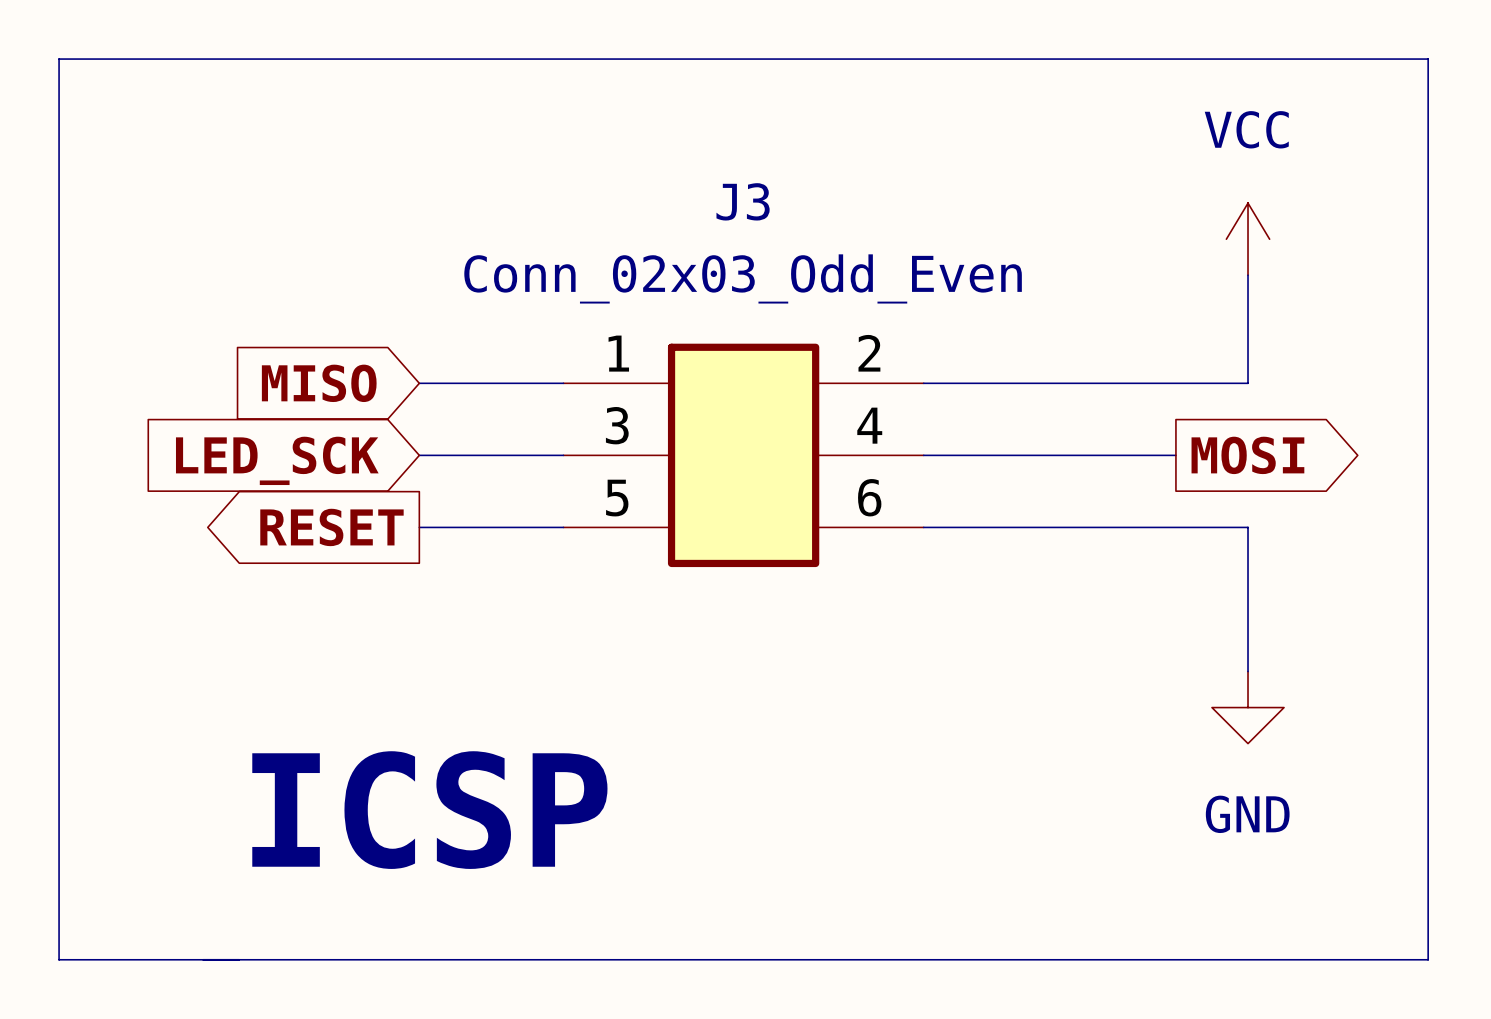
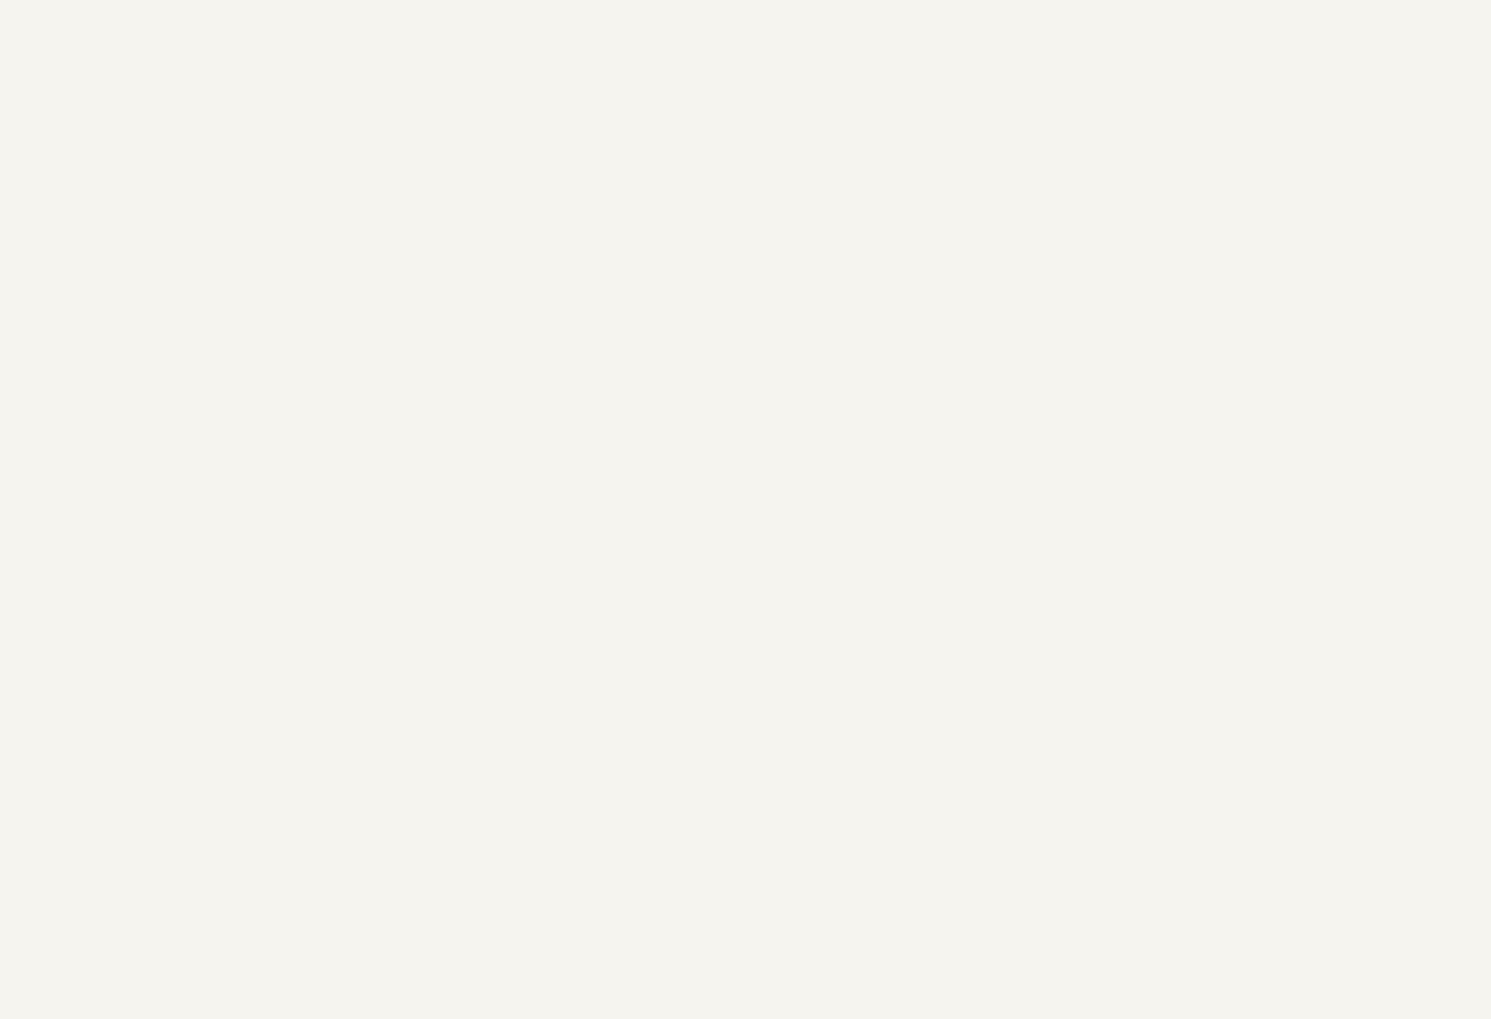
line: (59, 59) (59, 959) (1428, 959) (1428, 59) (59, 59) -> none
power symbol: VCC (1248, 239) -> none
wire: (1248, 275) (1248, 383) (923, 383) -> none
global label: MISO (319, 383) -> none
wire: (419, 383) (563, 383) -> none
wire: (419, 455) (563, 455) -> none
J3: Conn_02x03_Odd_Even (743, 455) -> none
wire: (923, 455) (1175, 455) -> none
global label: MOSI (1247, 455) -> none
global label: LED_SCK (277, 460) -> none
global label: RESET (331, 527) -> none
wire: (419, 527) (563, 527) -> none
wire: (923, 527) (1248, 527) (1248, 671) -> none
power symbol: GND (1248, 707) -> none
text: ICSP (429, 810) -> none

